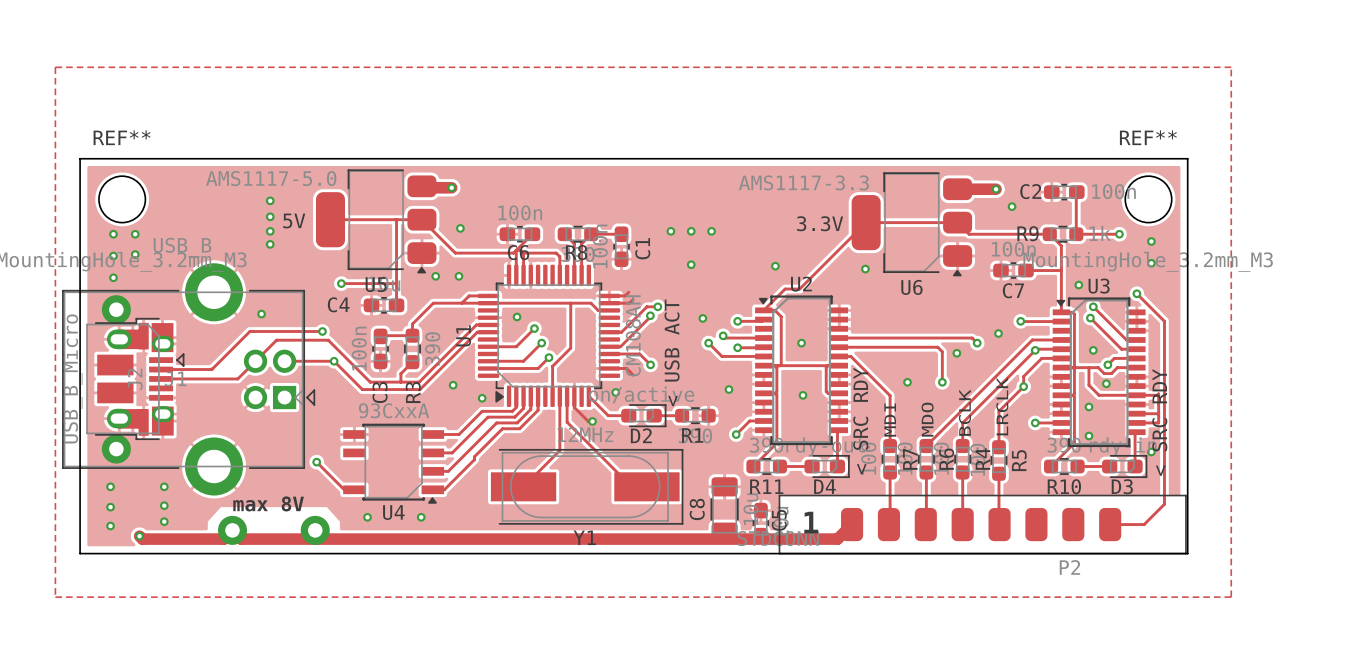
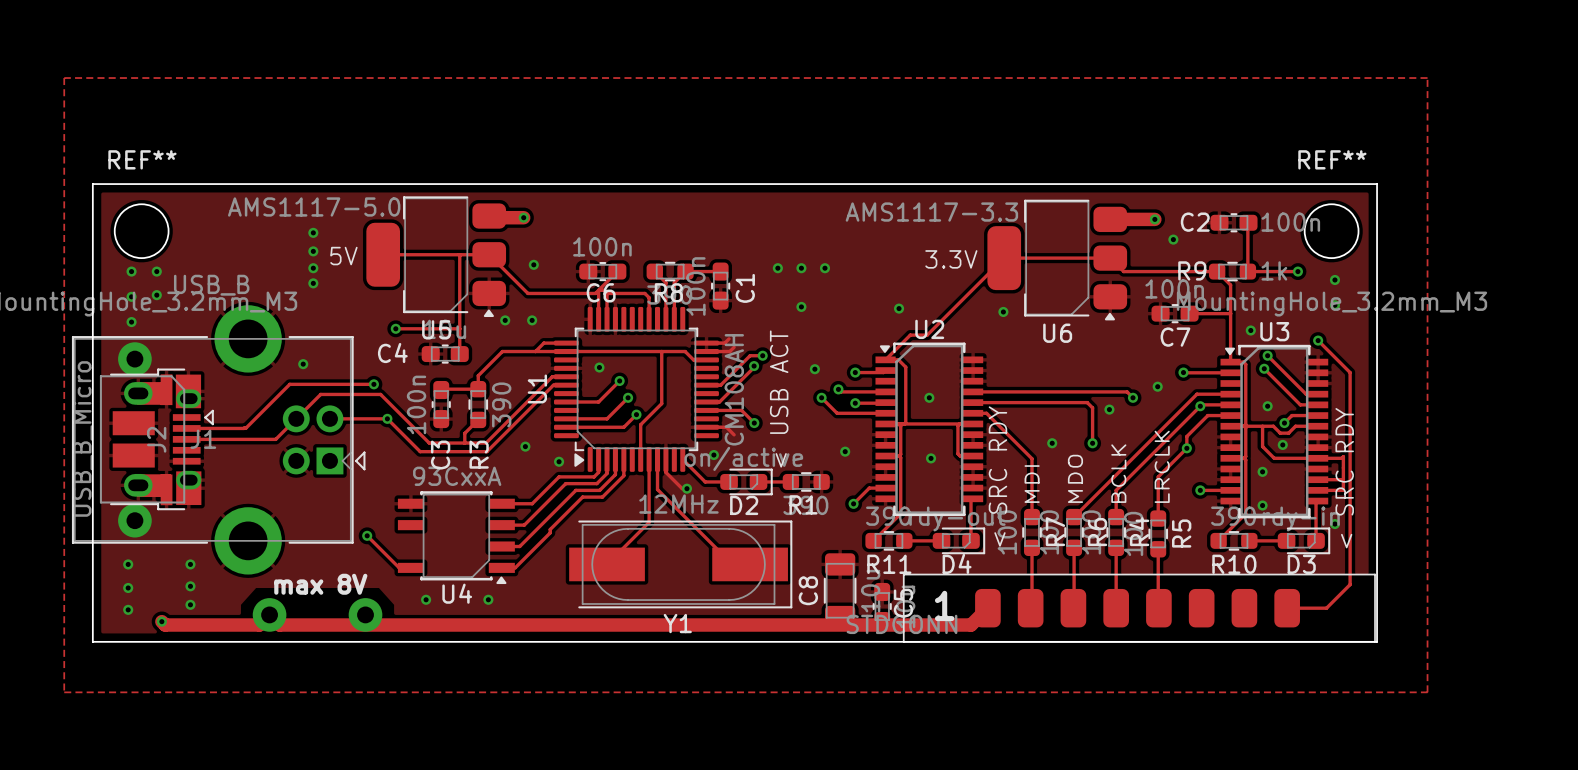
P2 name: P2 (1069, 567) -> none

